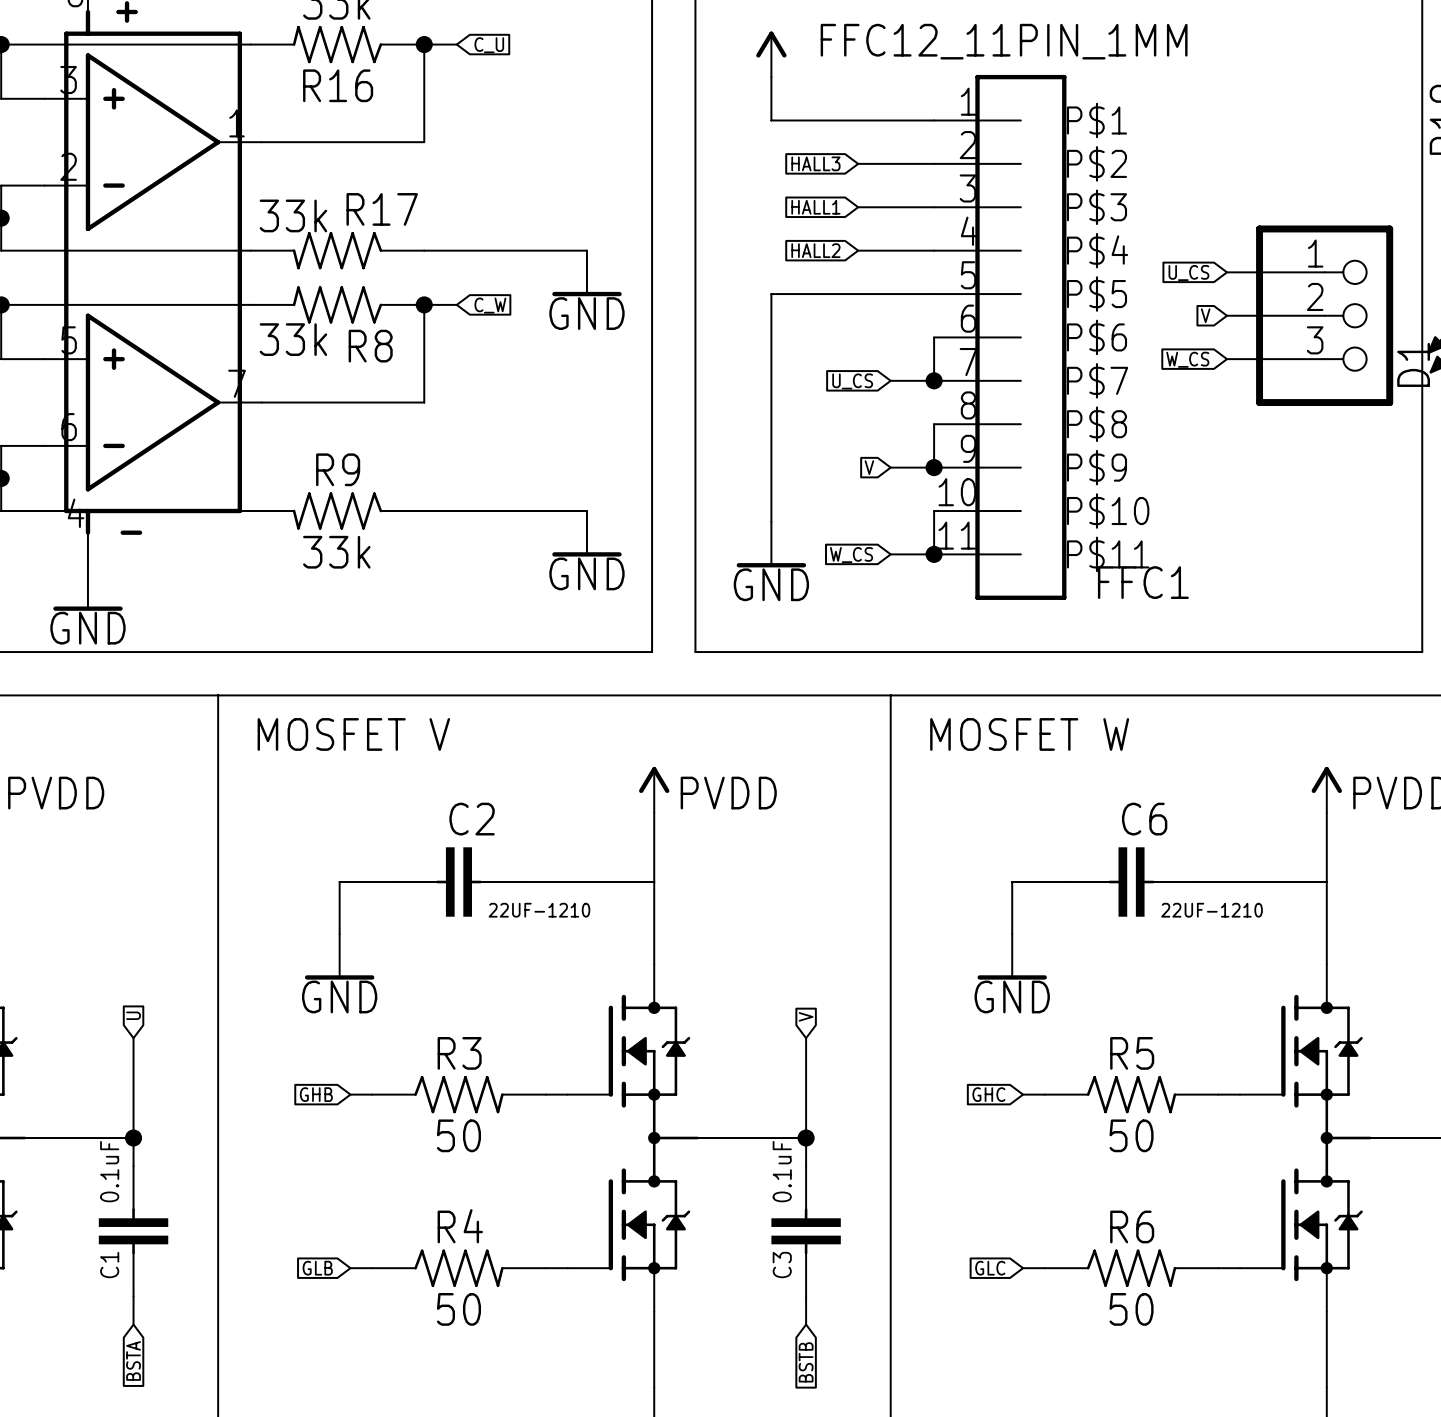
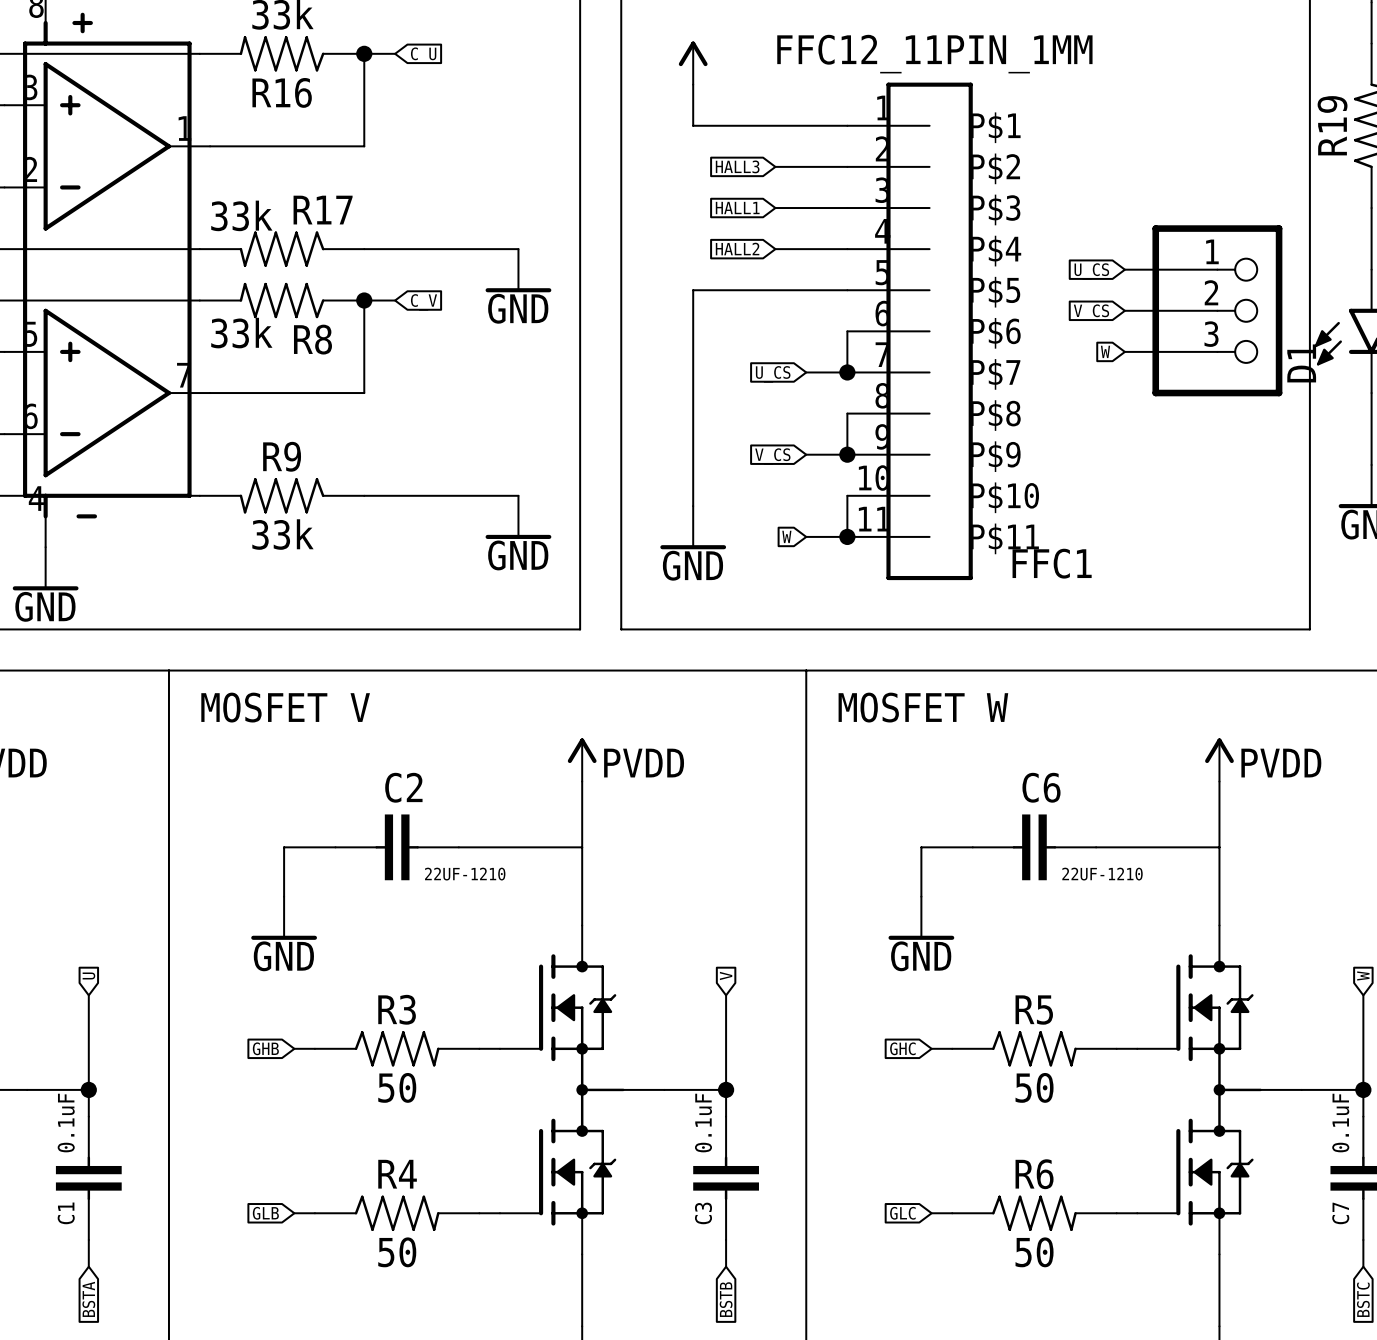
global label: C_W (490, 305) -> C_V (423, 302)
global label: V (1205, 315) -> V_CS (1091, 312)
global label: W_CS (1187, 359) -> W (1105, 351)
global label: V (869, 467) -> V_CS (772, 456)
global label: W_CS (851, 555) -> W (786, 536)

